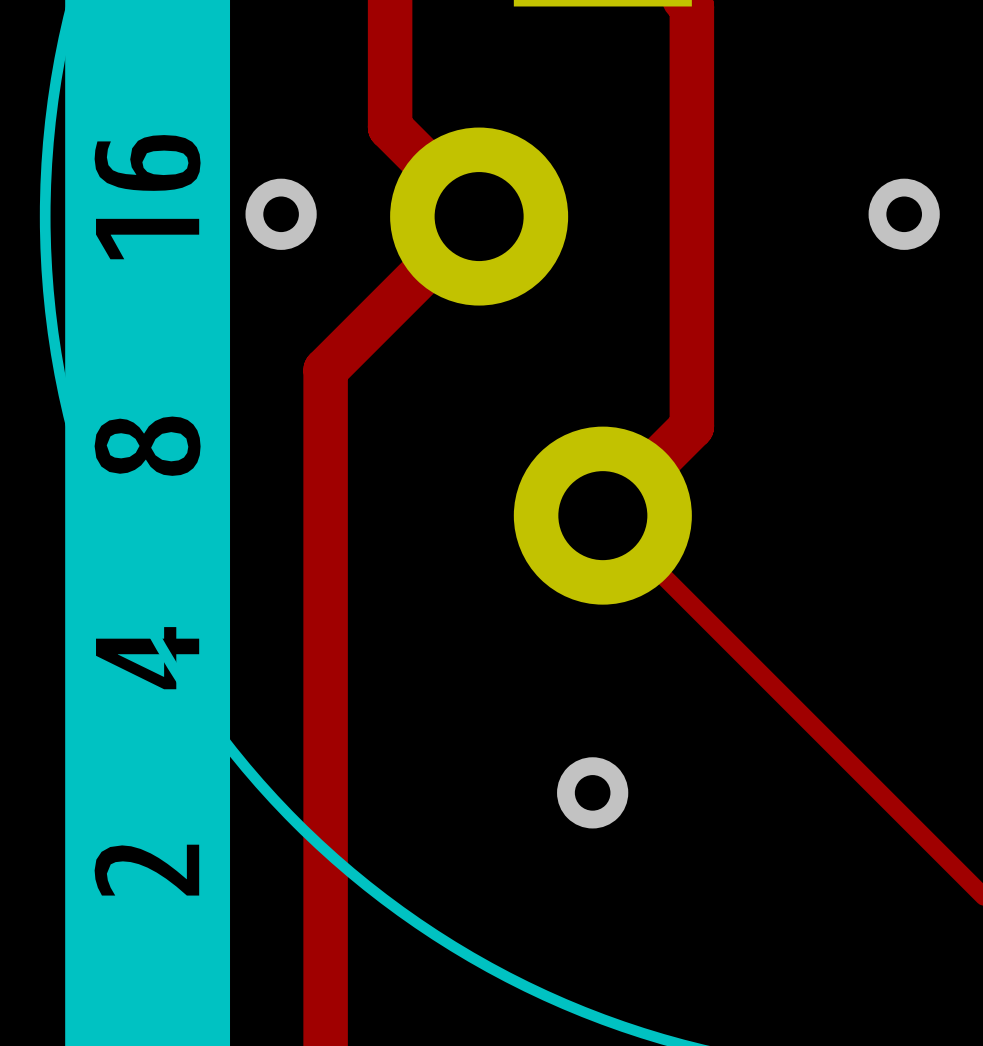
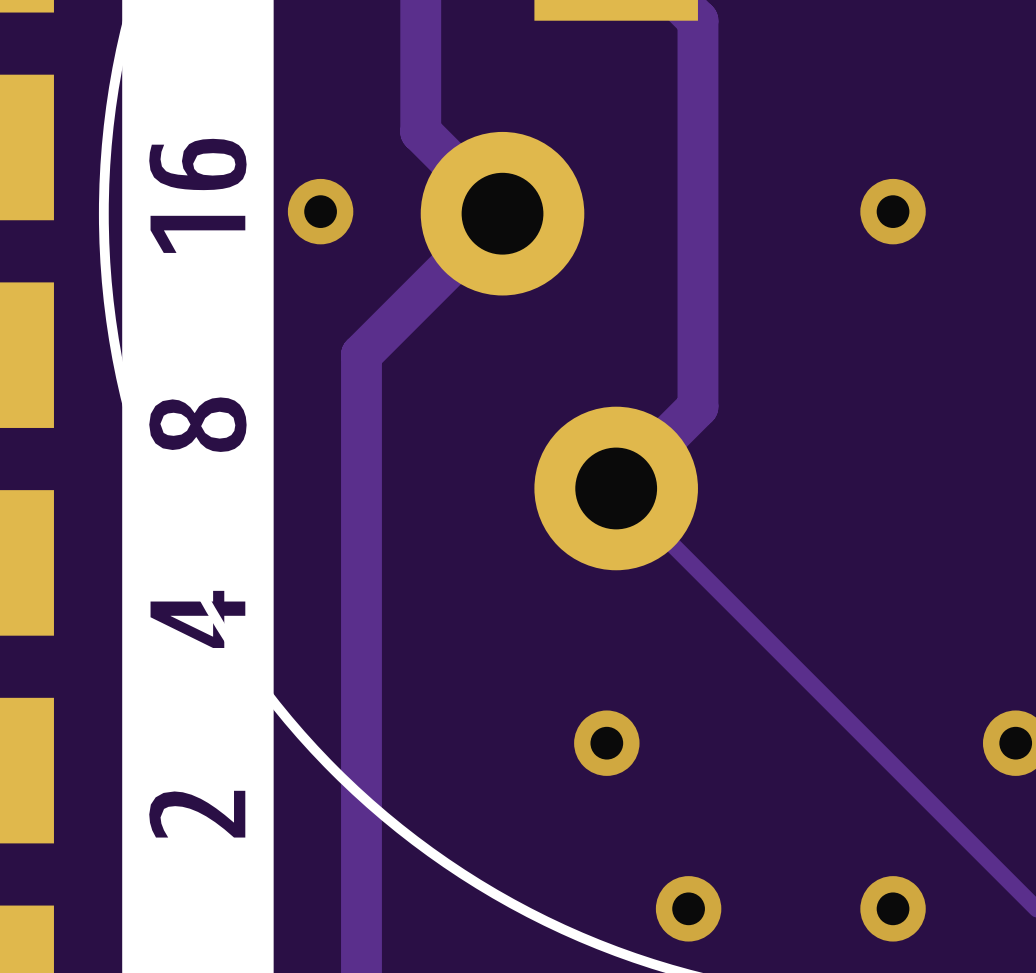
via: none -> (688, 908)
via: none -> (893, 908)

